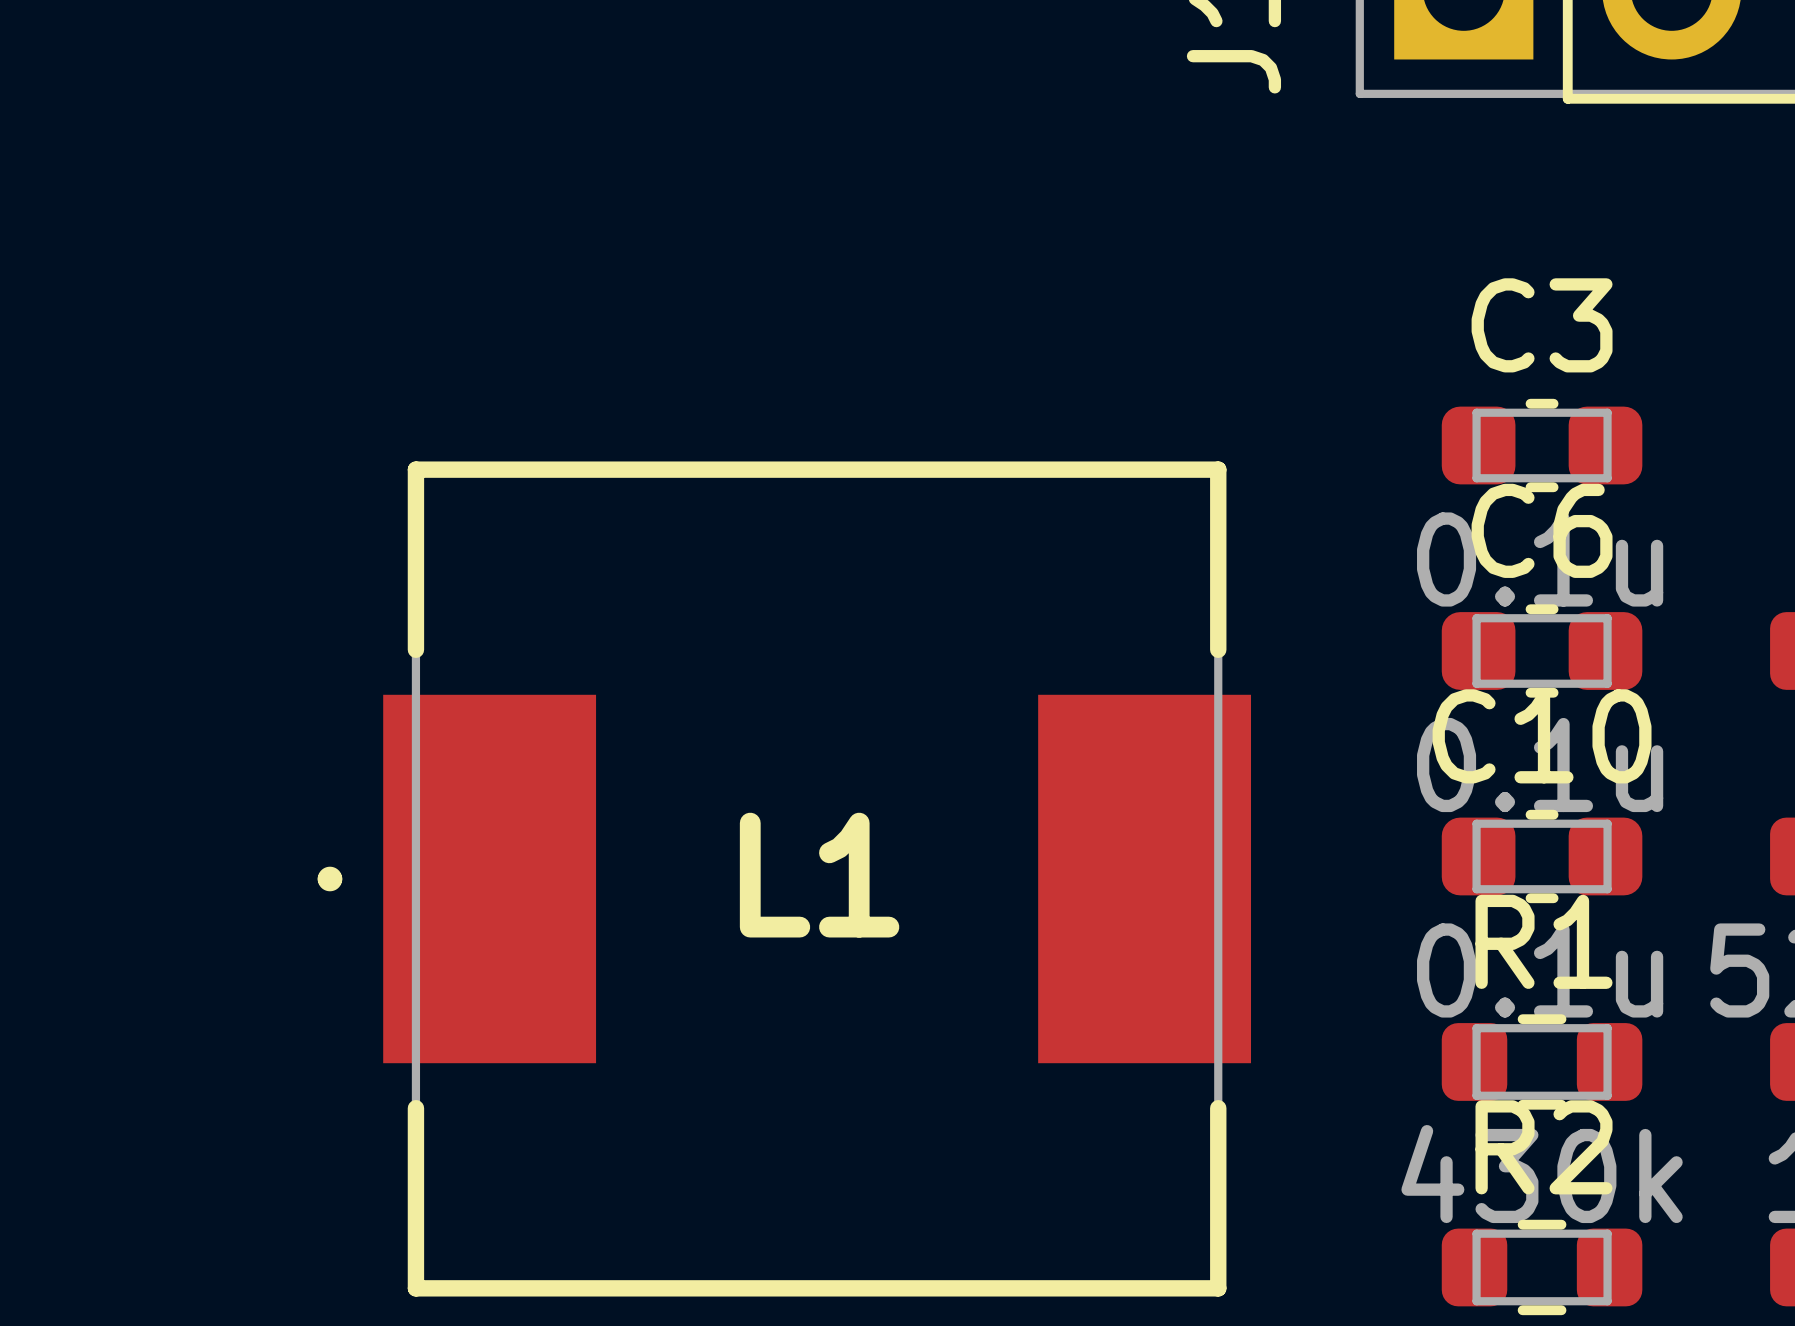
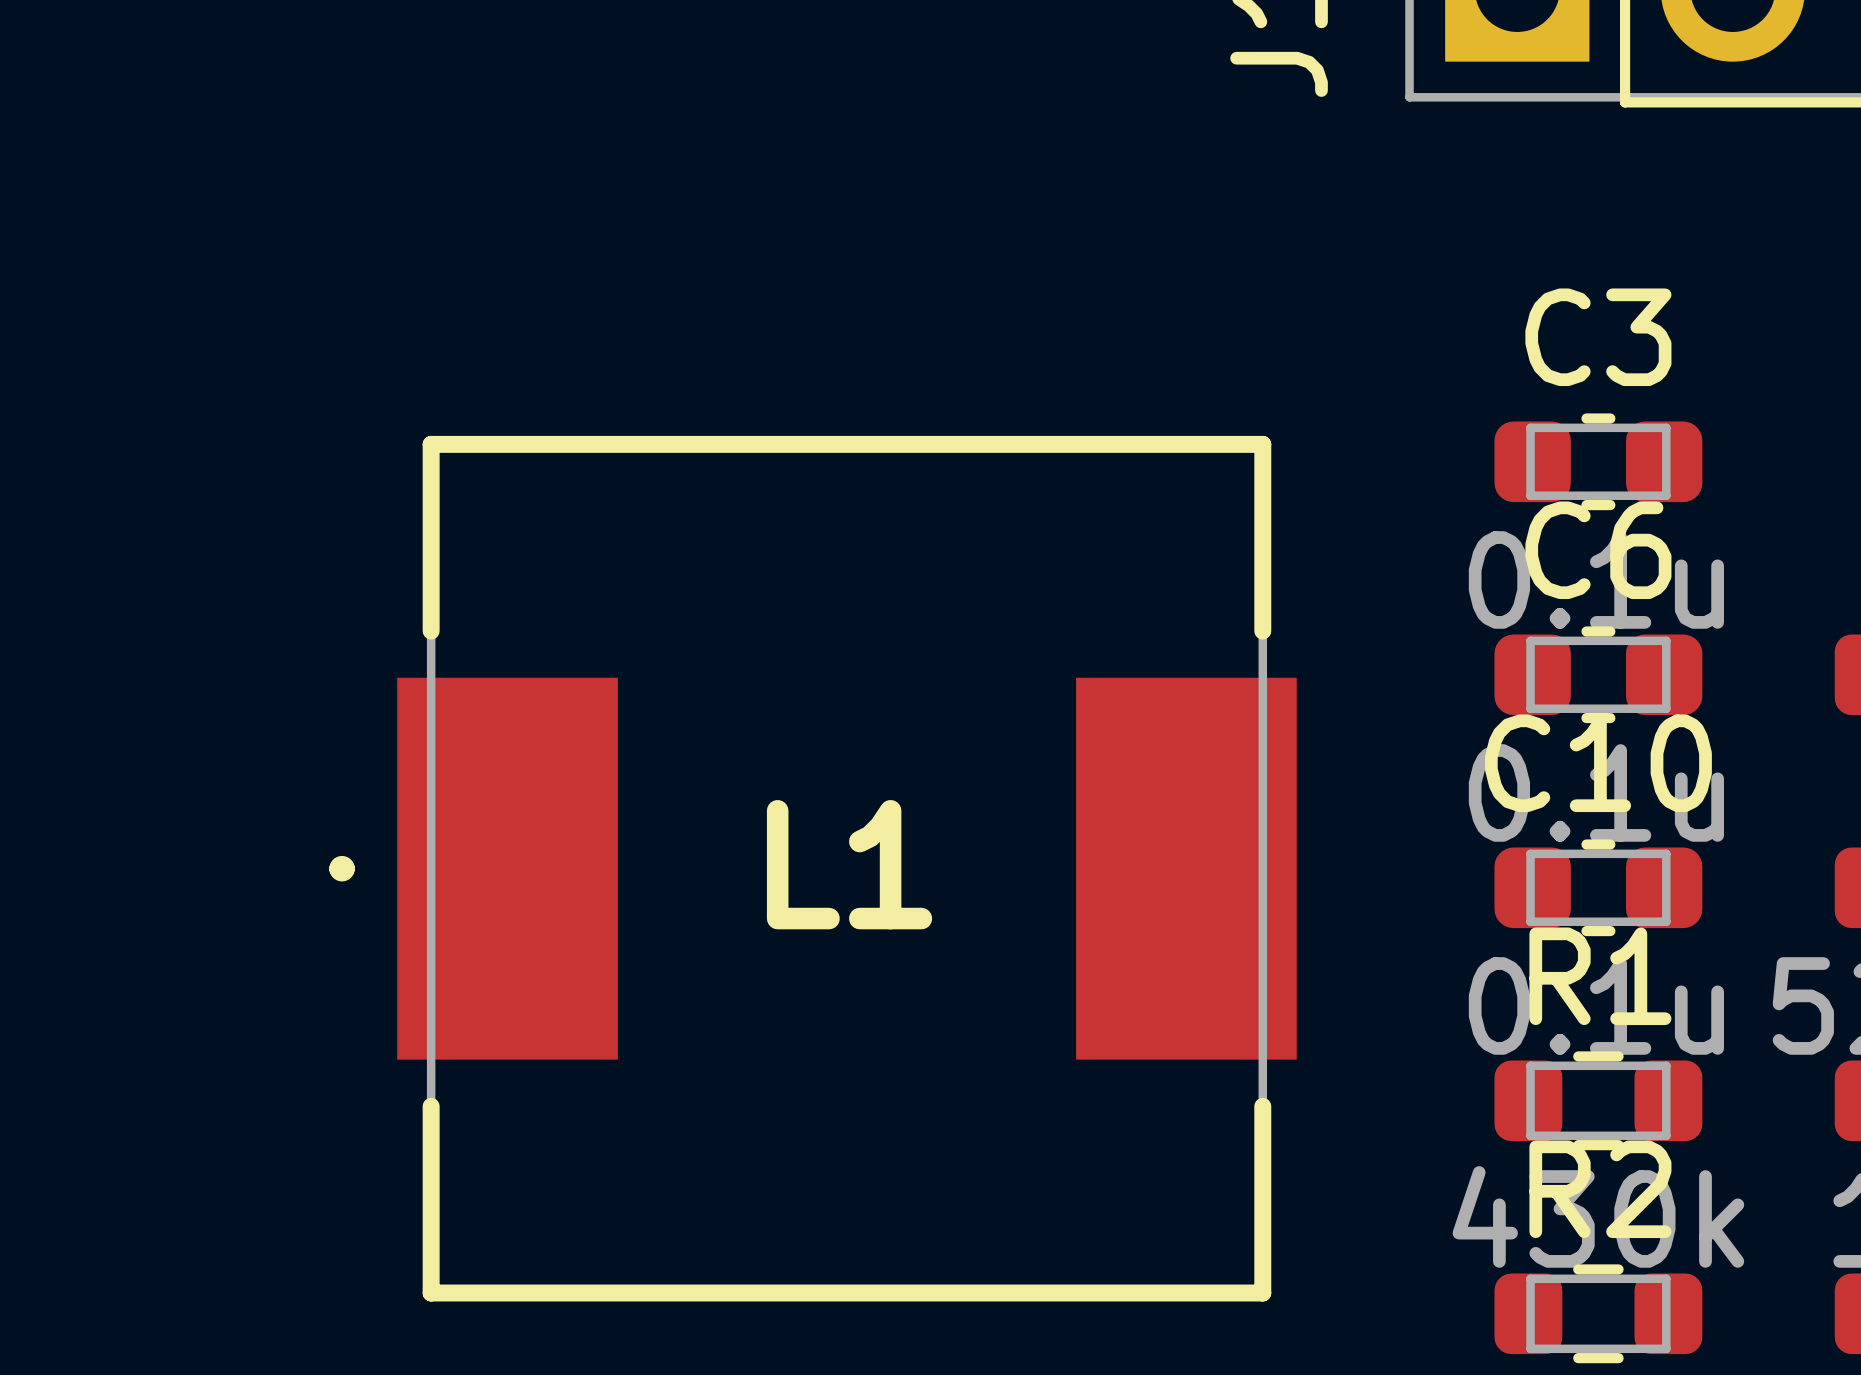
L1 position: (784, 878) -> (813, 868)

